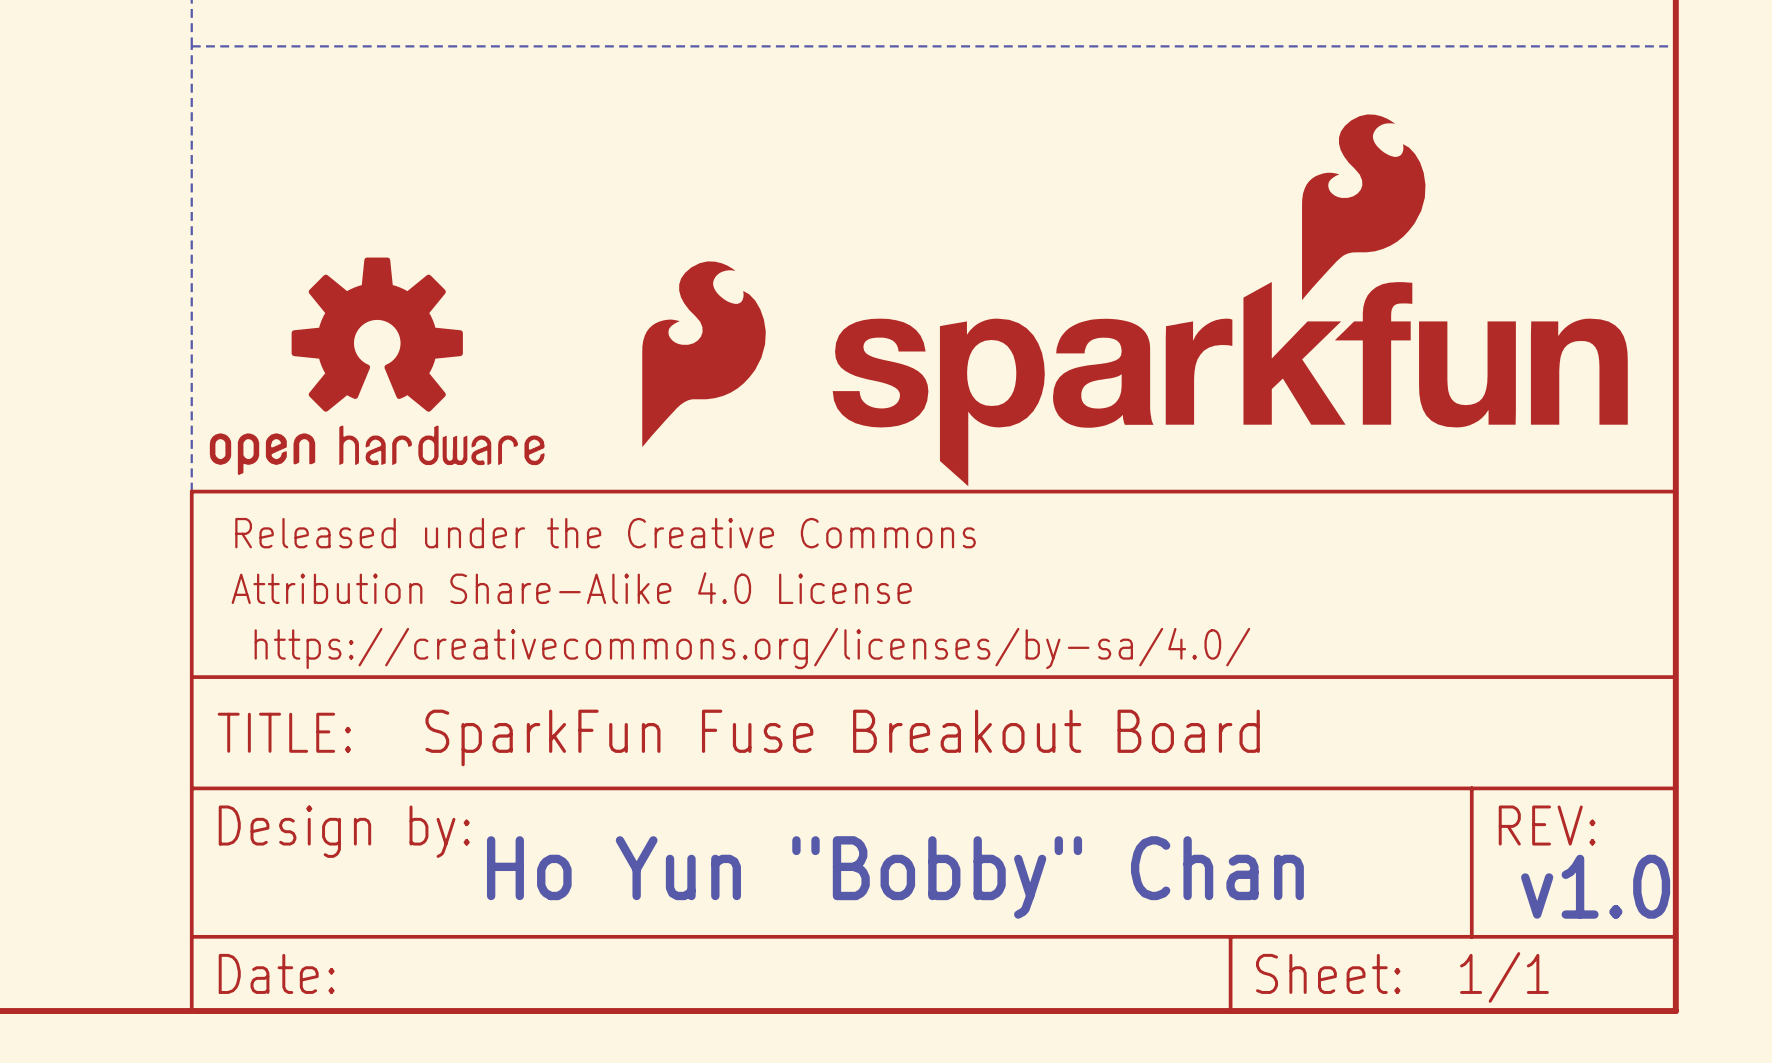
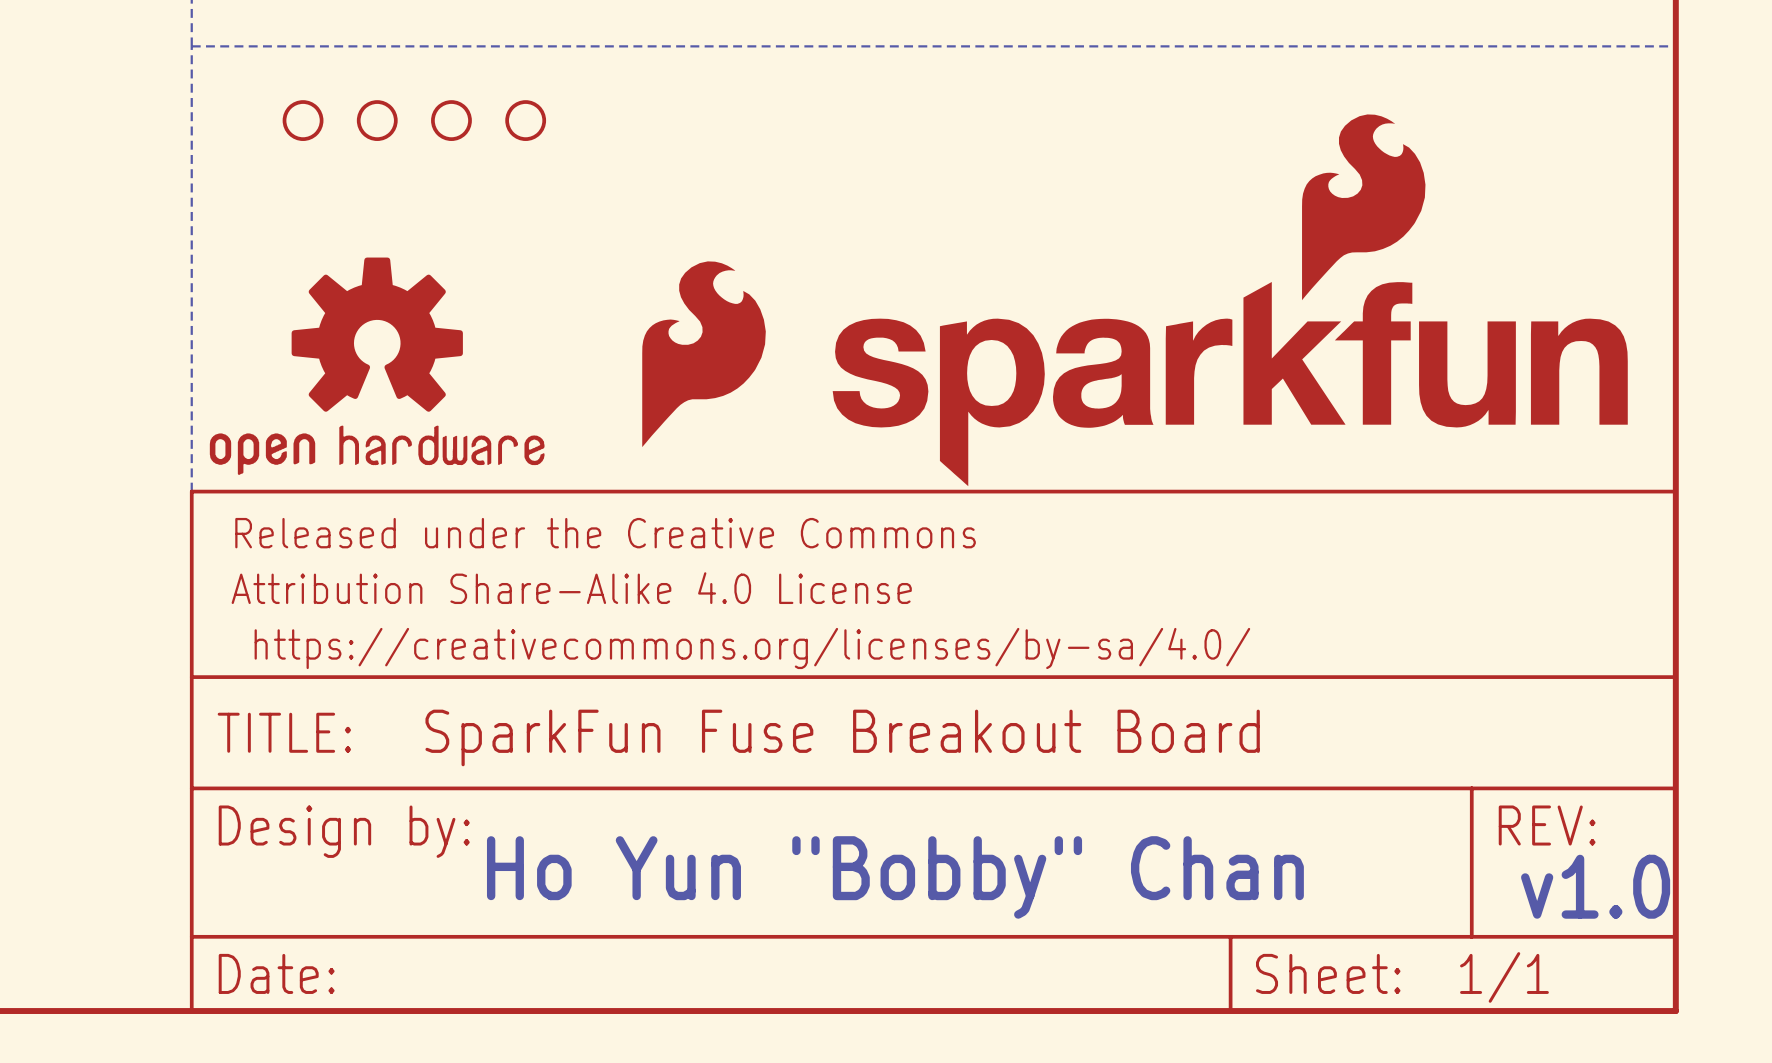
part: none -> (303, 120)
part: none -> (377, 120)
part: none -> (451, 120)
part: none -> (525, 120)

